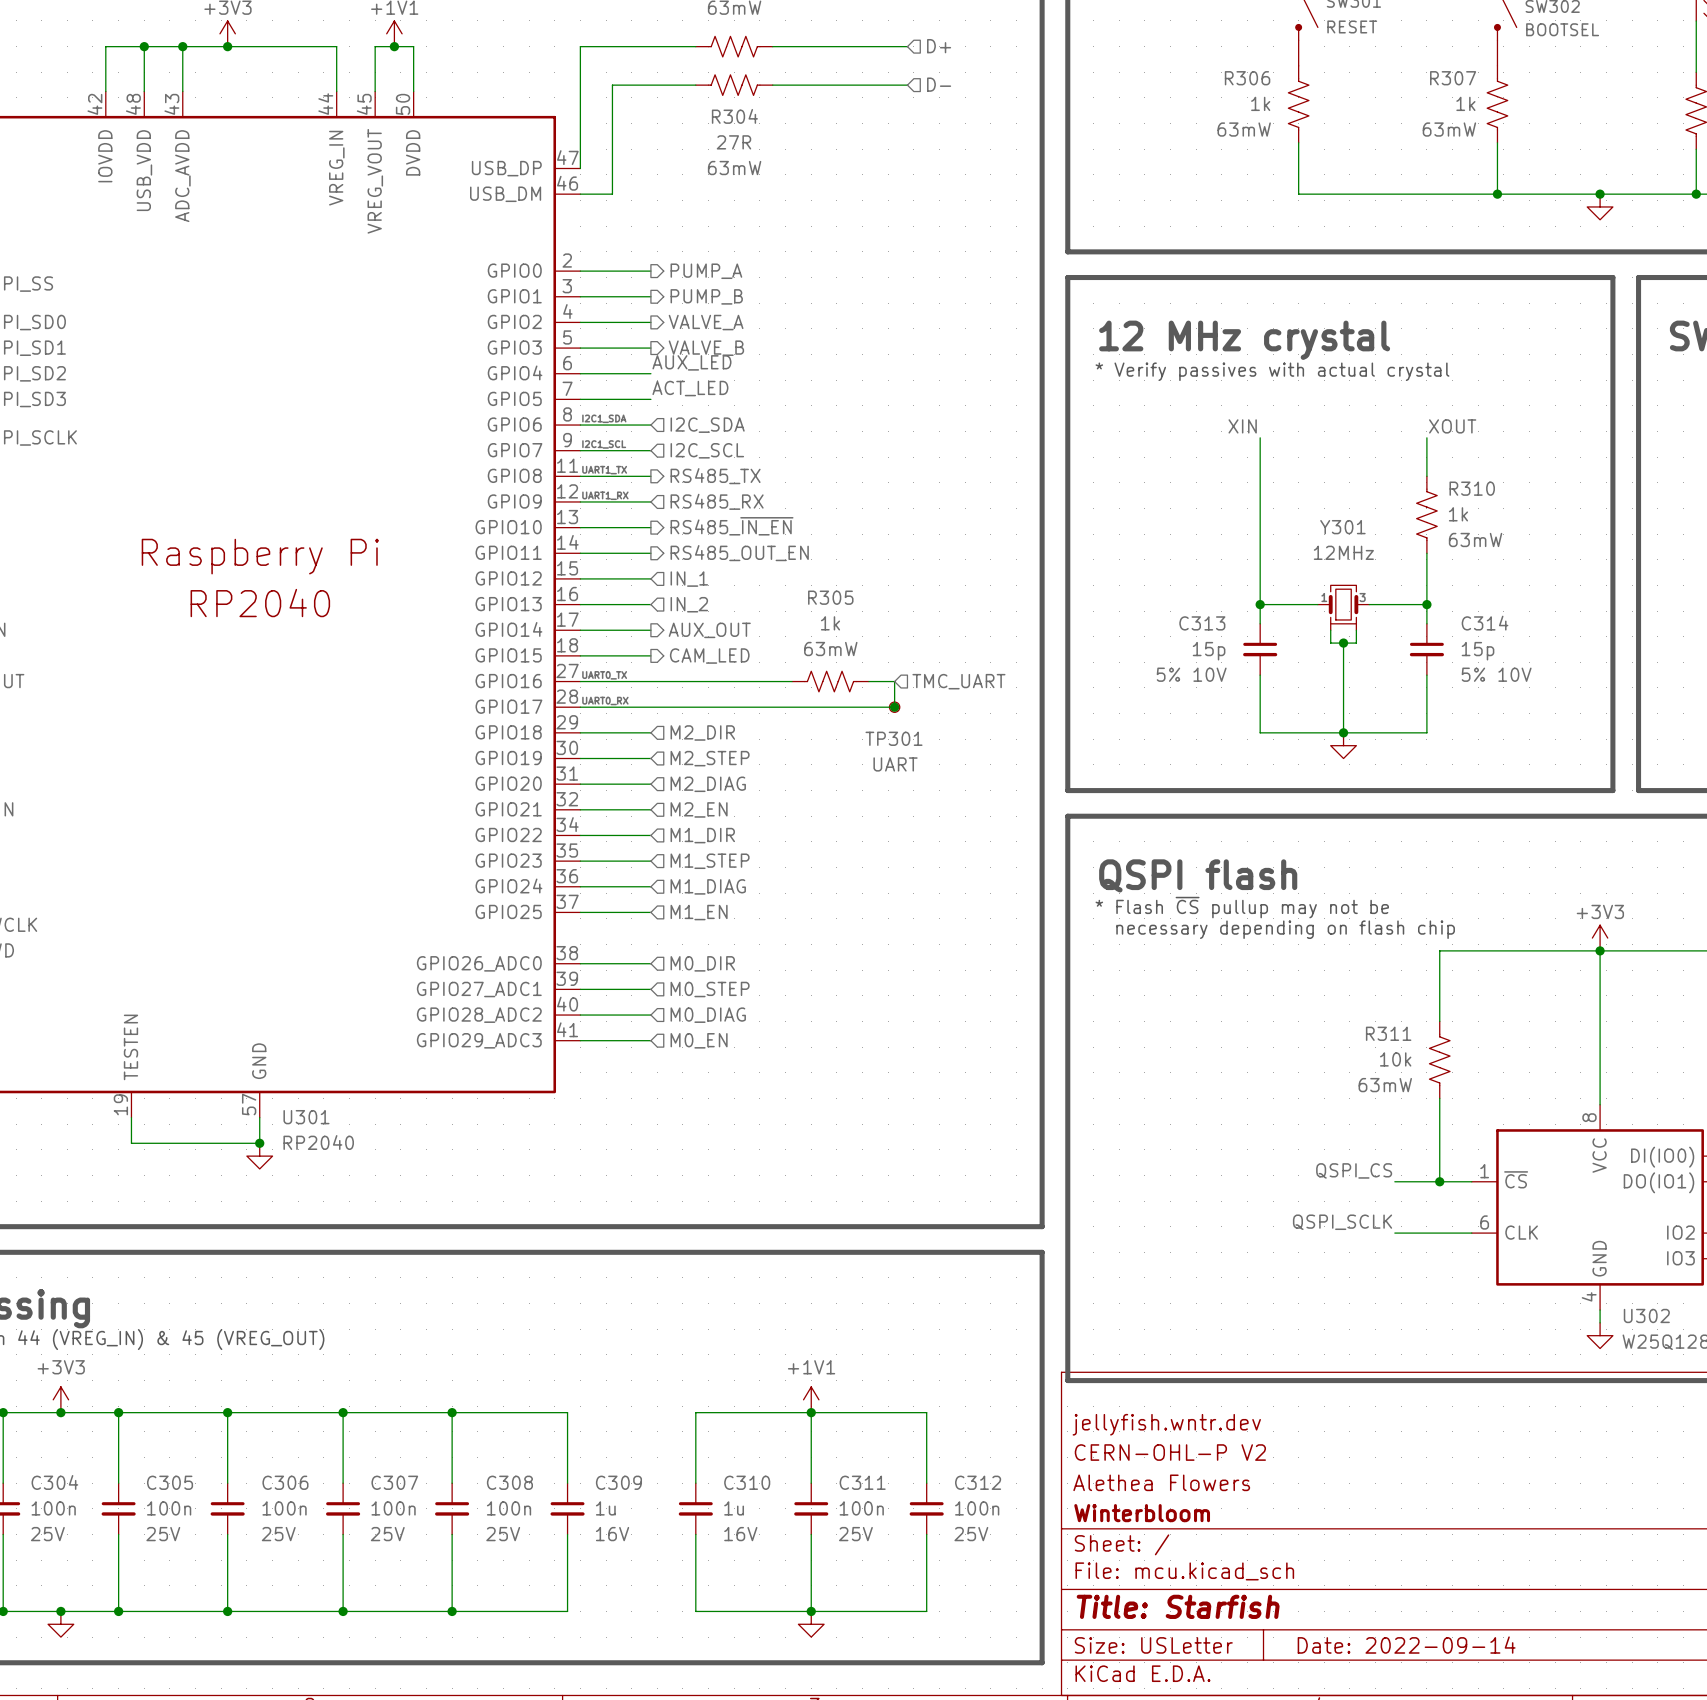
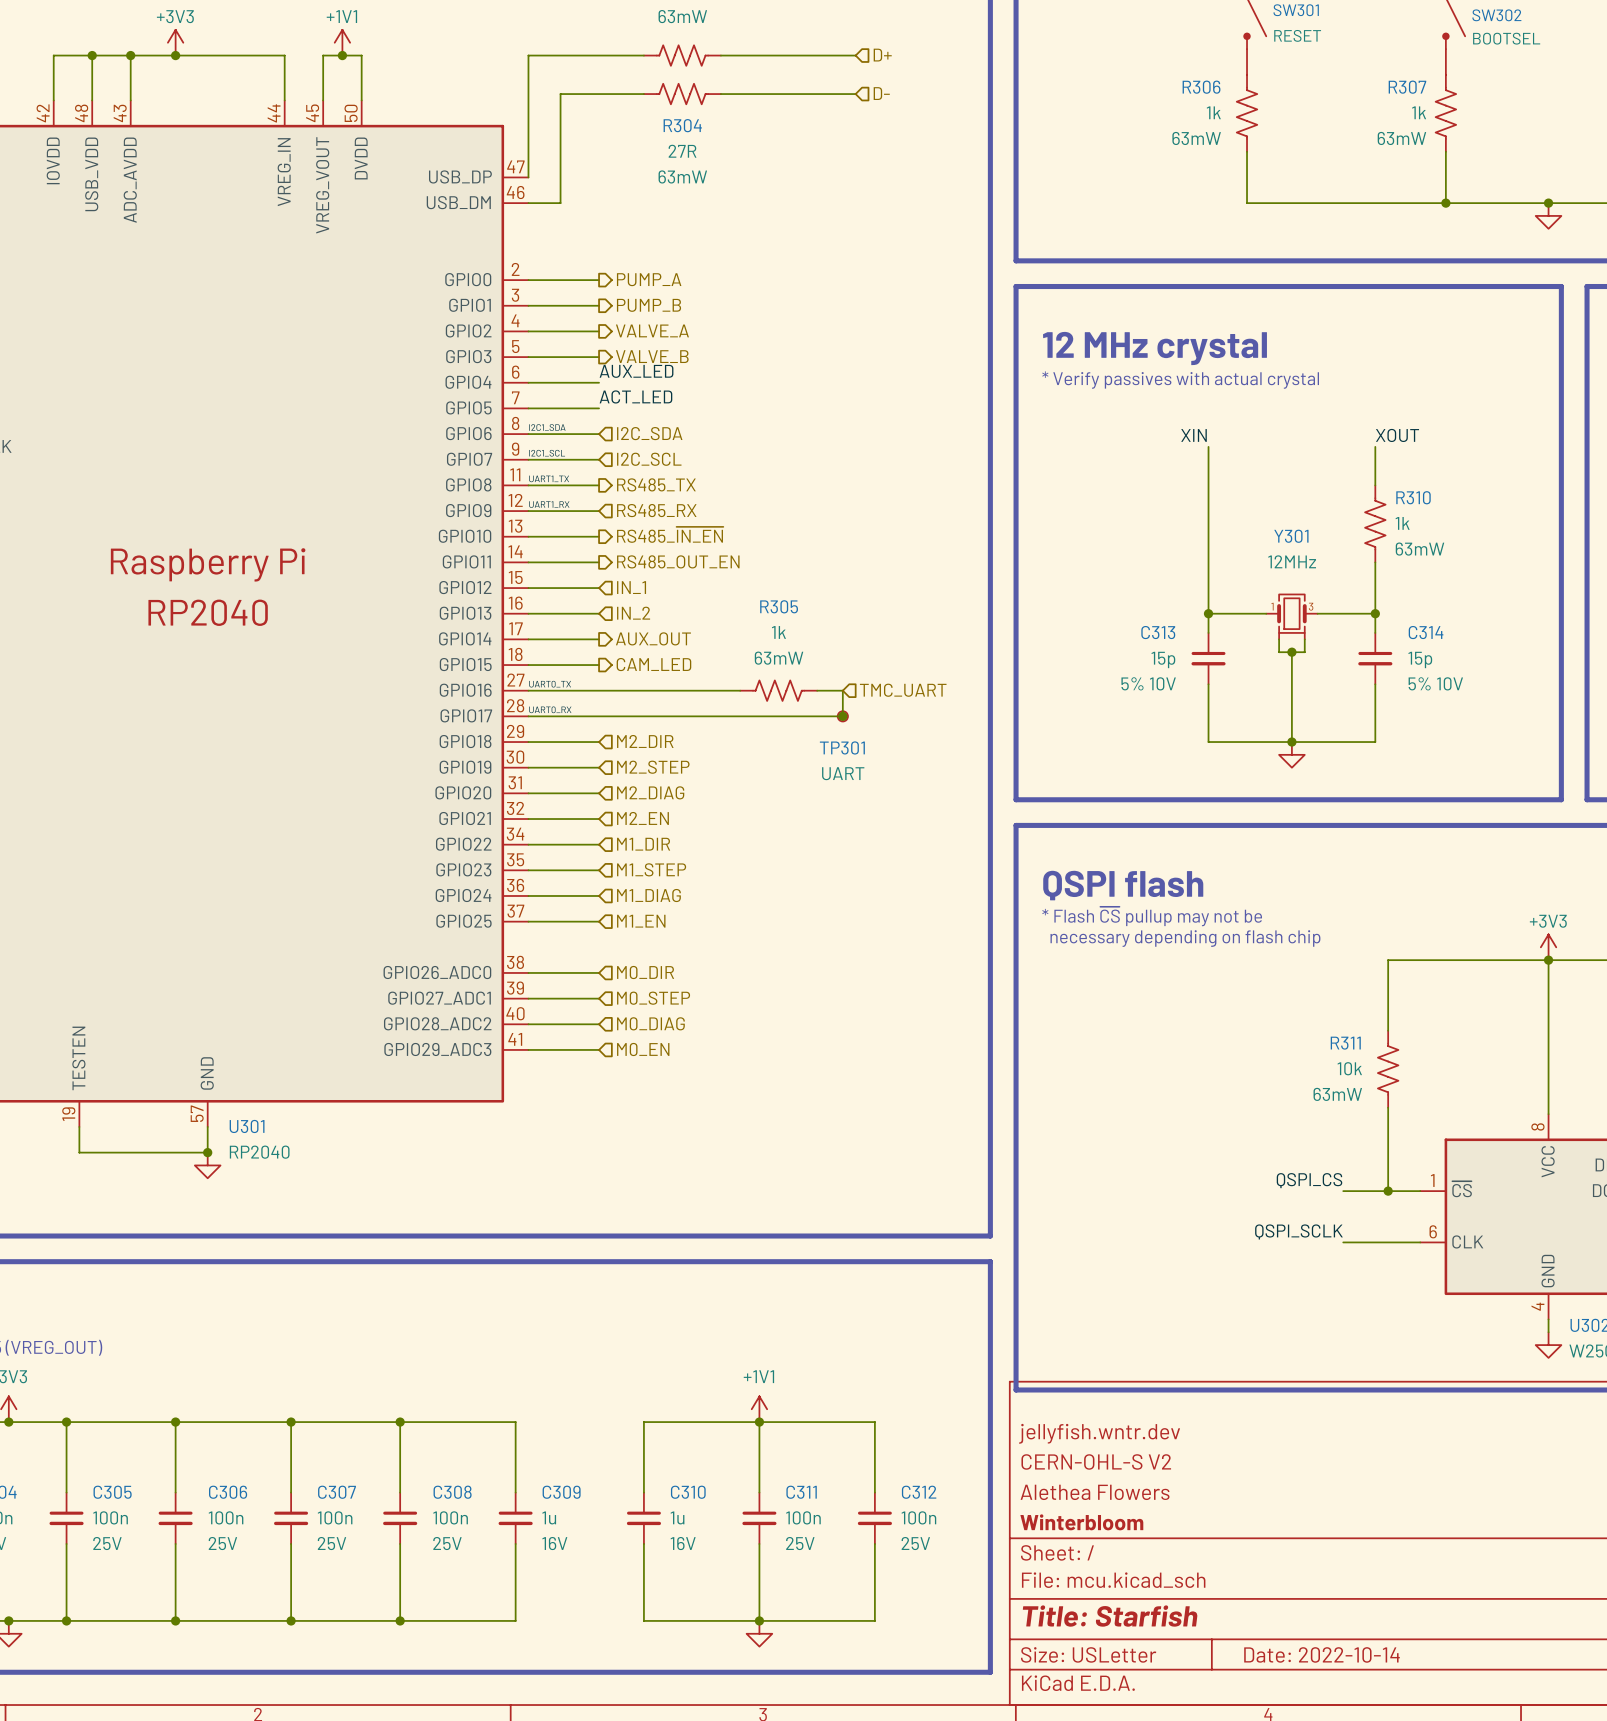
title block: CERN-OHL-P V2 (1170, 1452) -> CERN-OHL-S V2 (1096, 1461)
title block: Date: 2022-09-14 (1406, 1645) -> Date: 2022-10-14 (1322, 1654)

